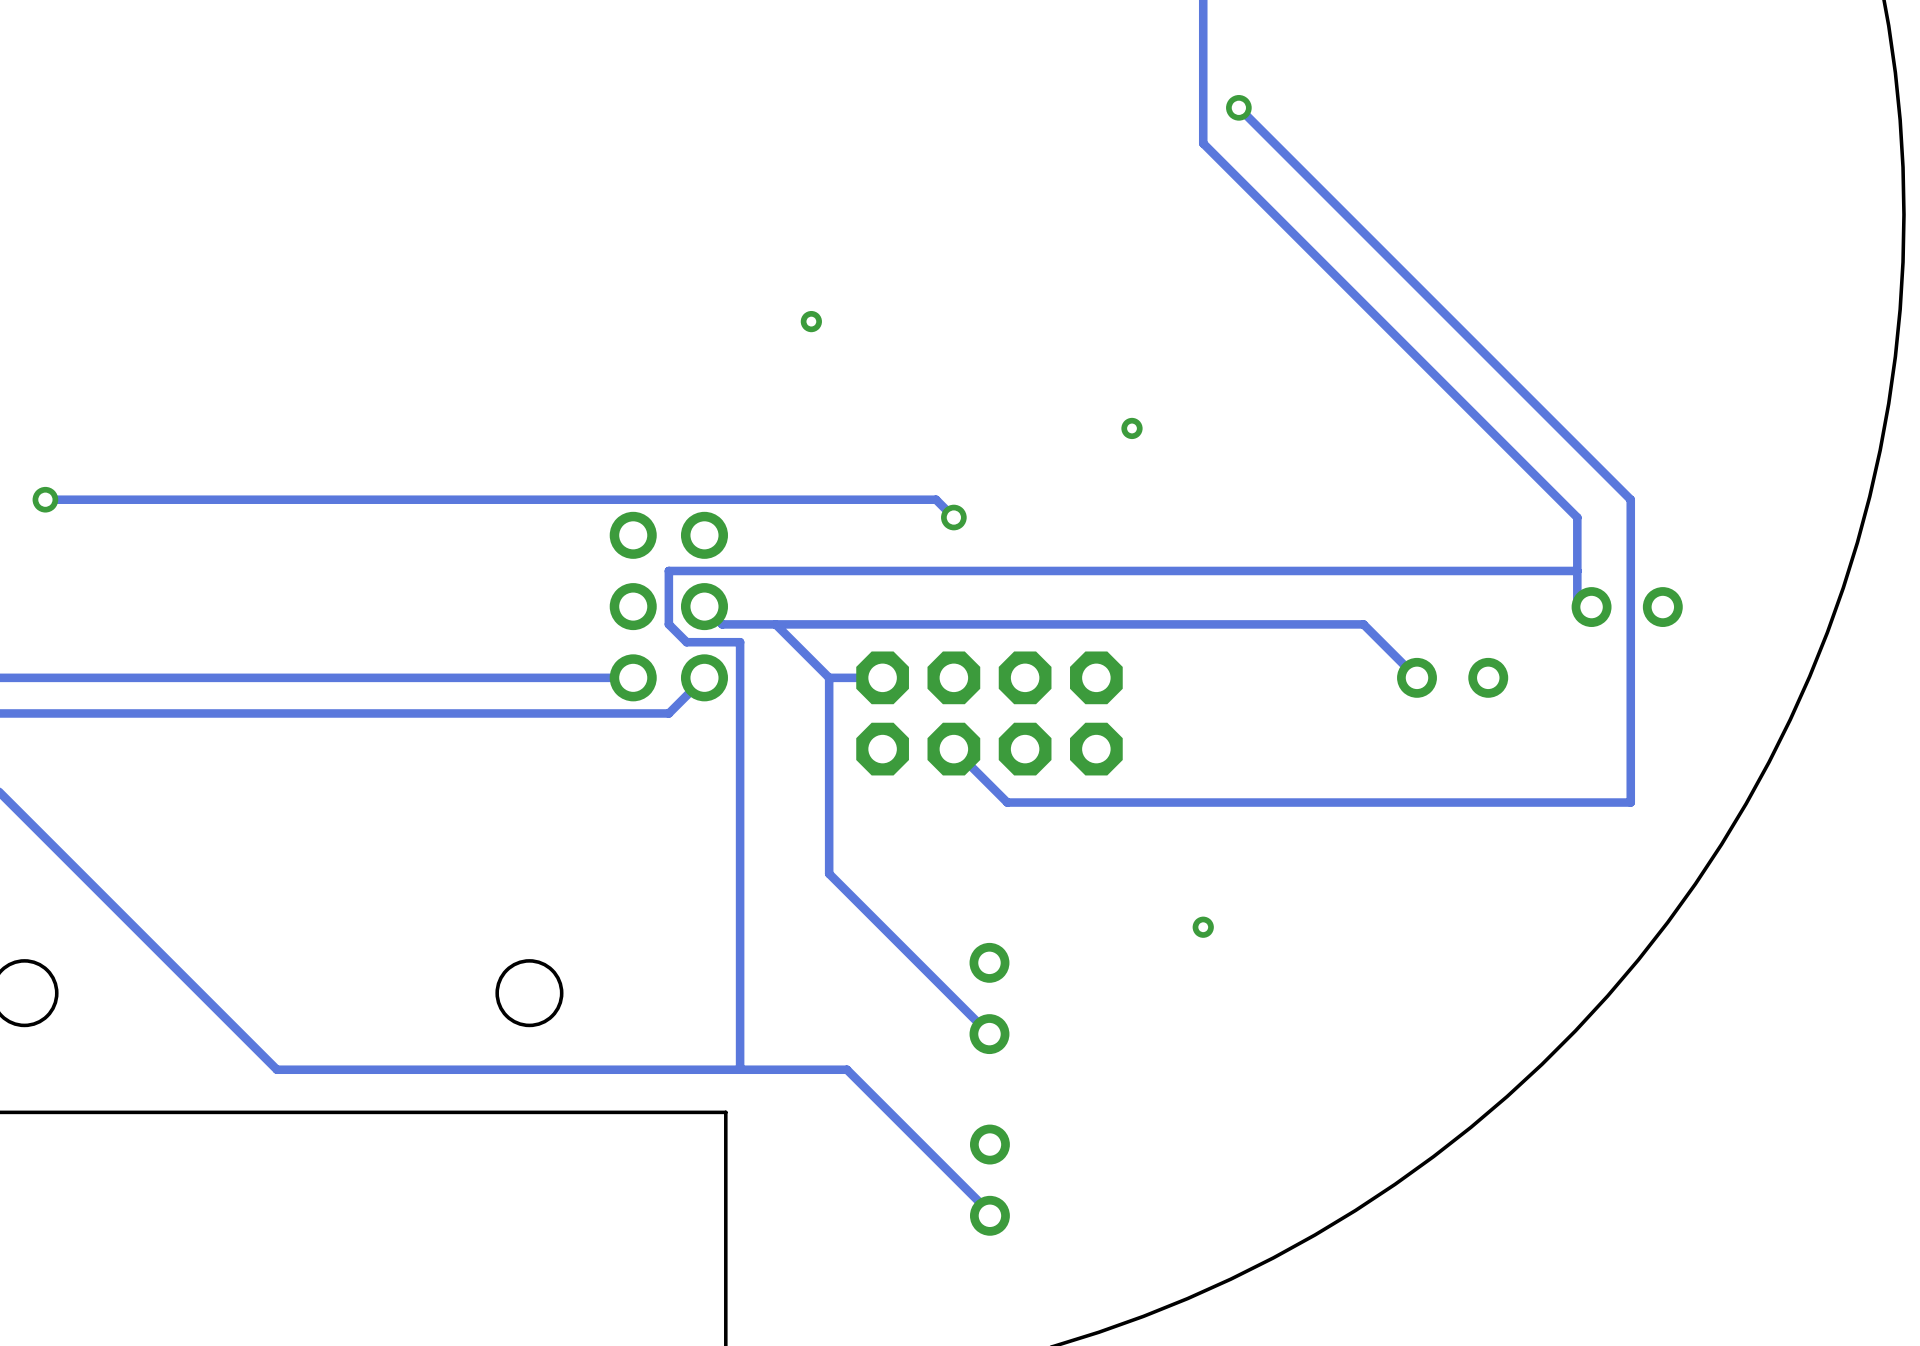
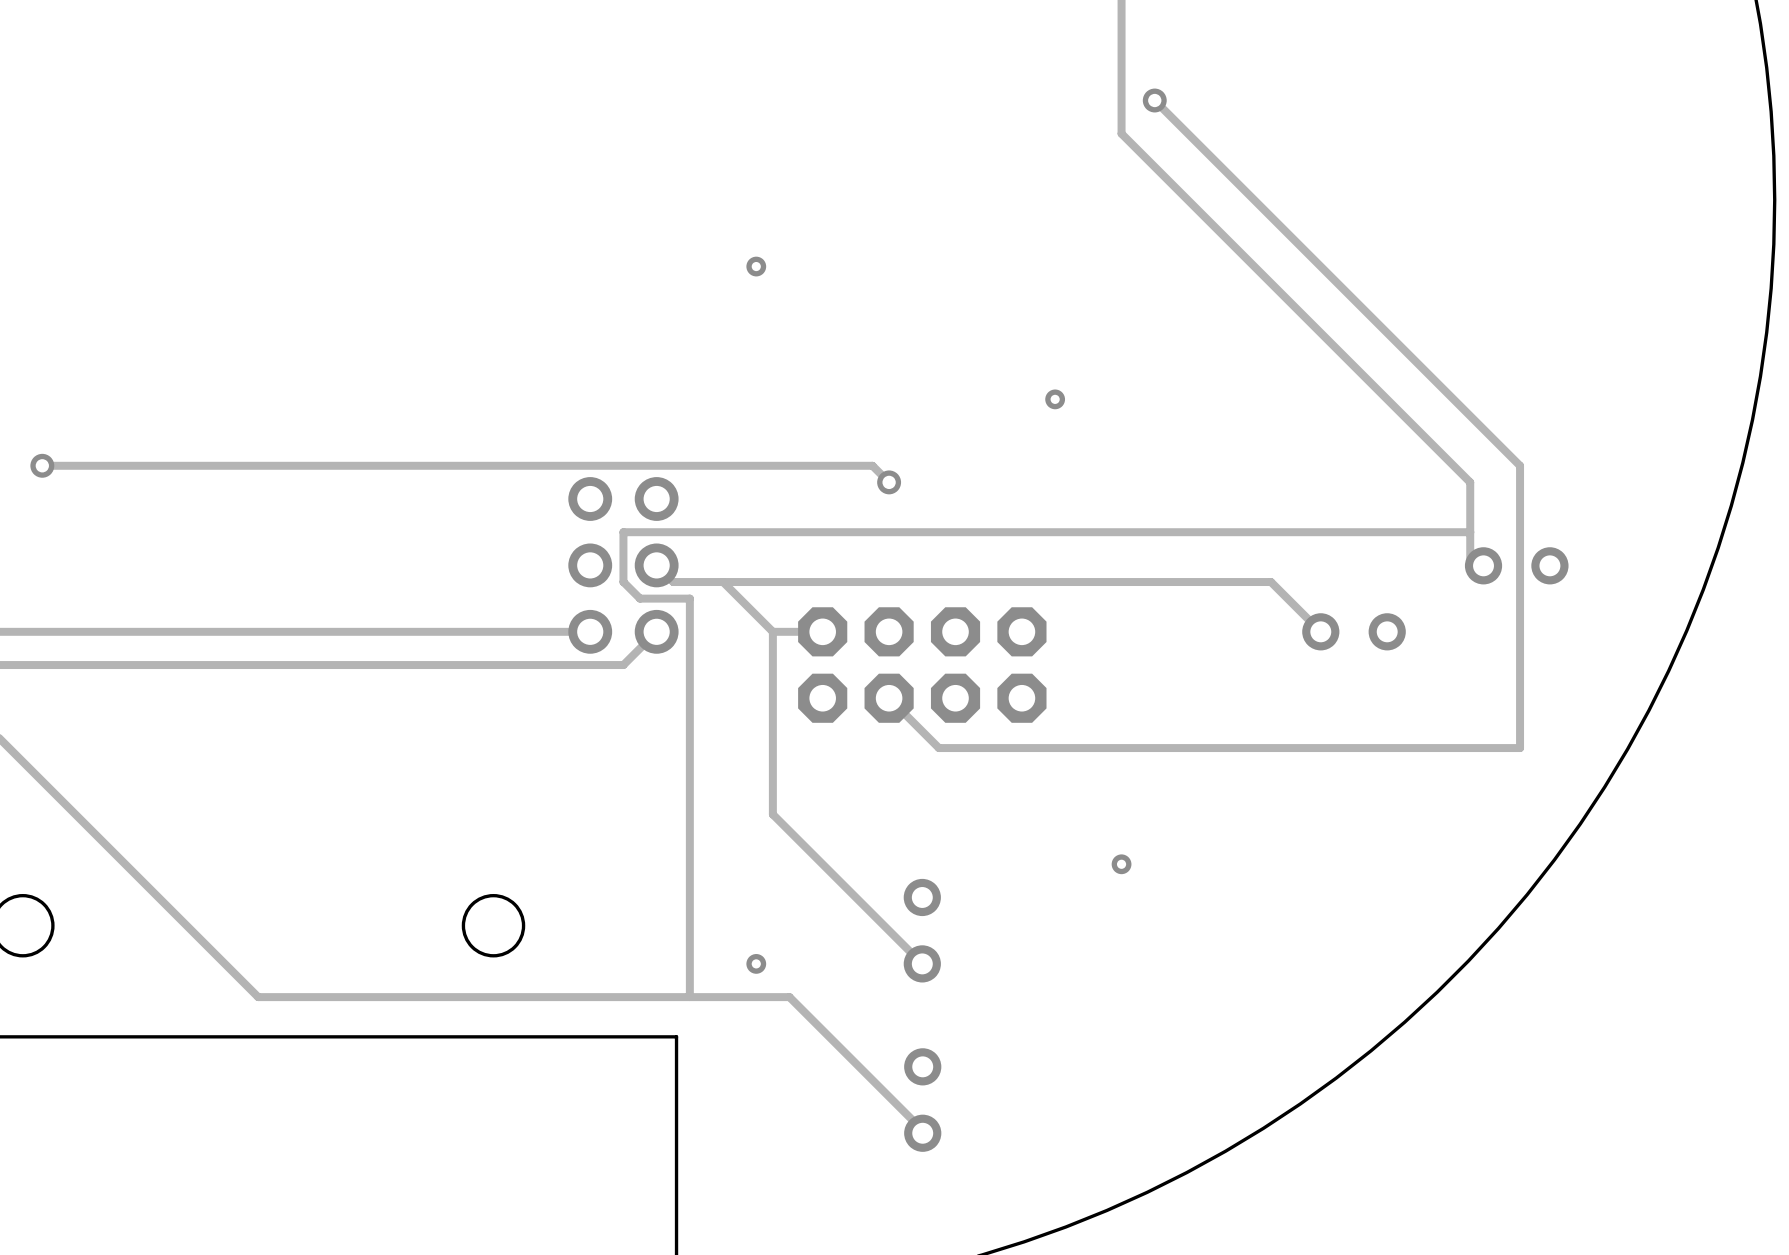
via position: (811, 321) -> (756, 266)
via: none -> (756, 963)

